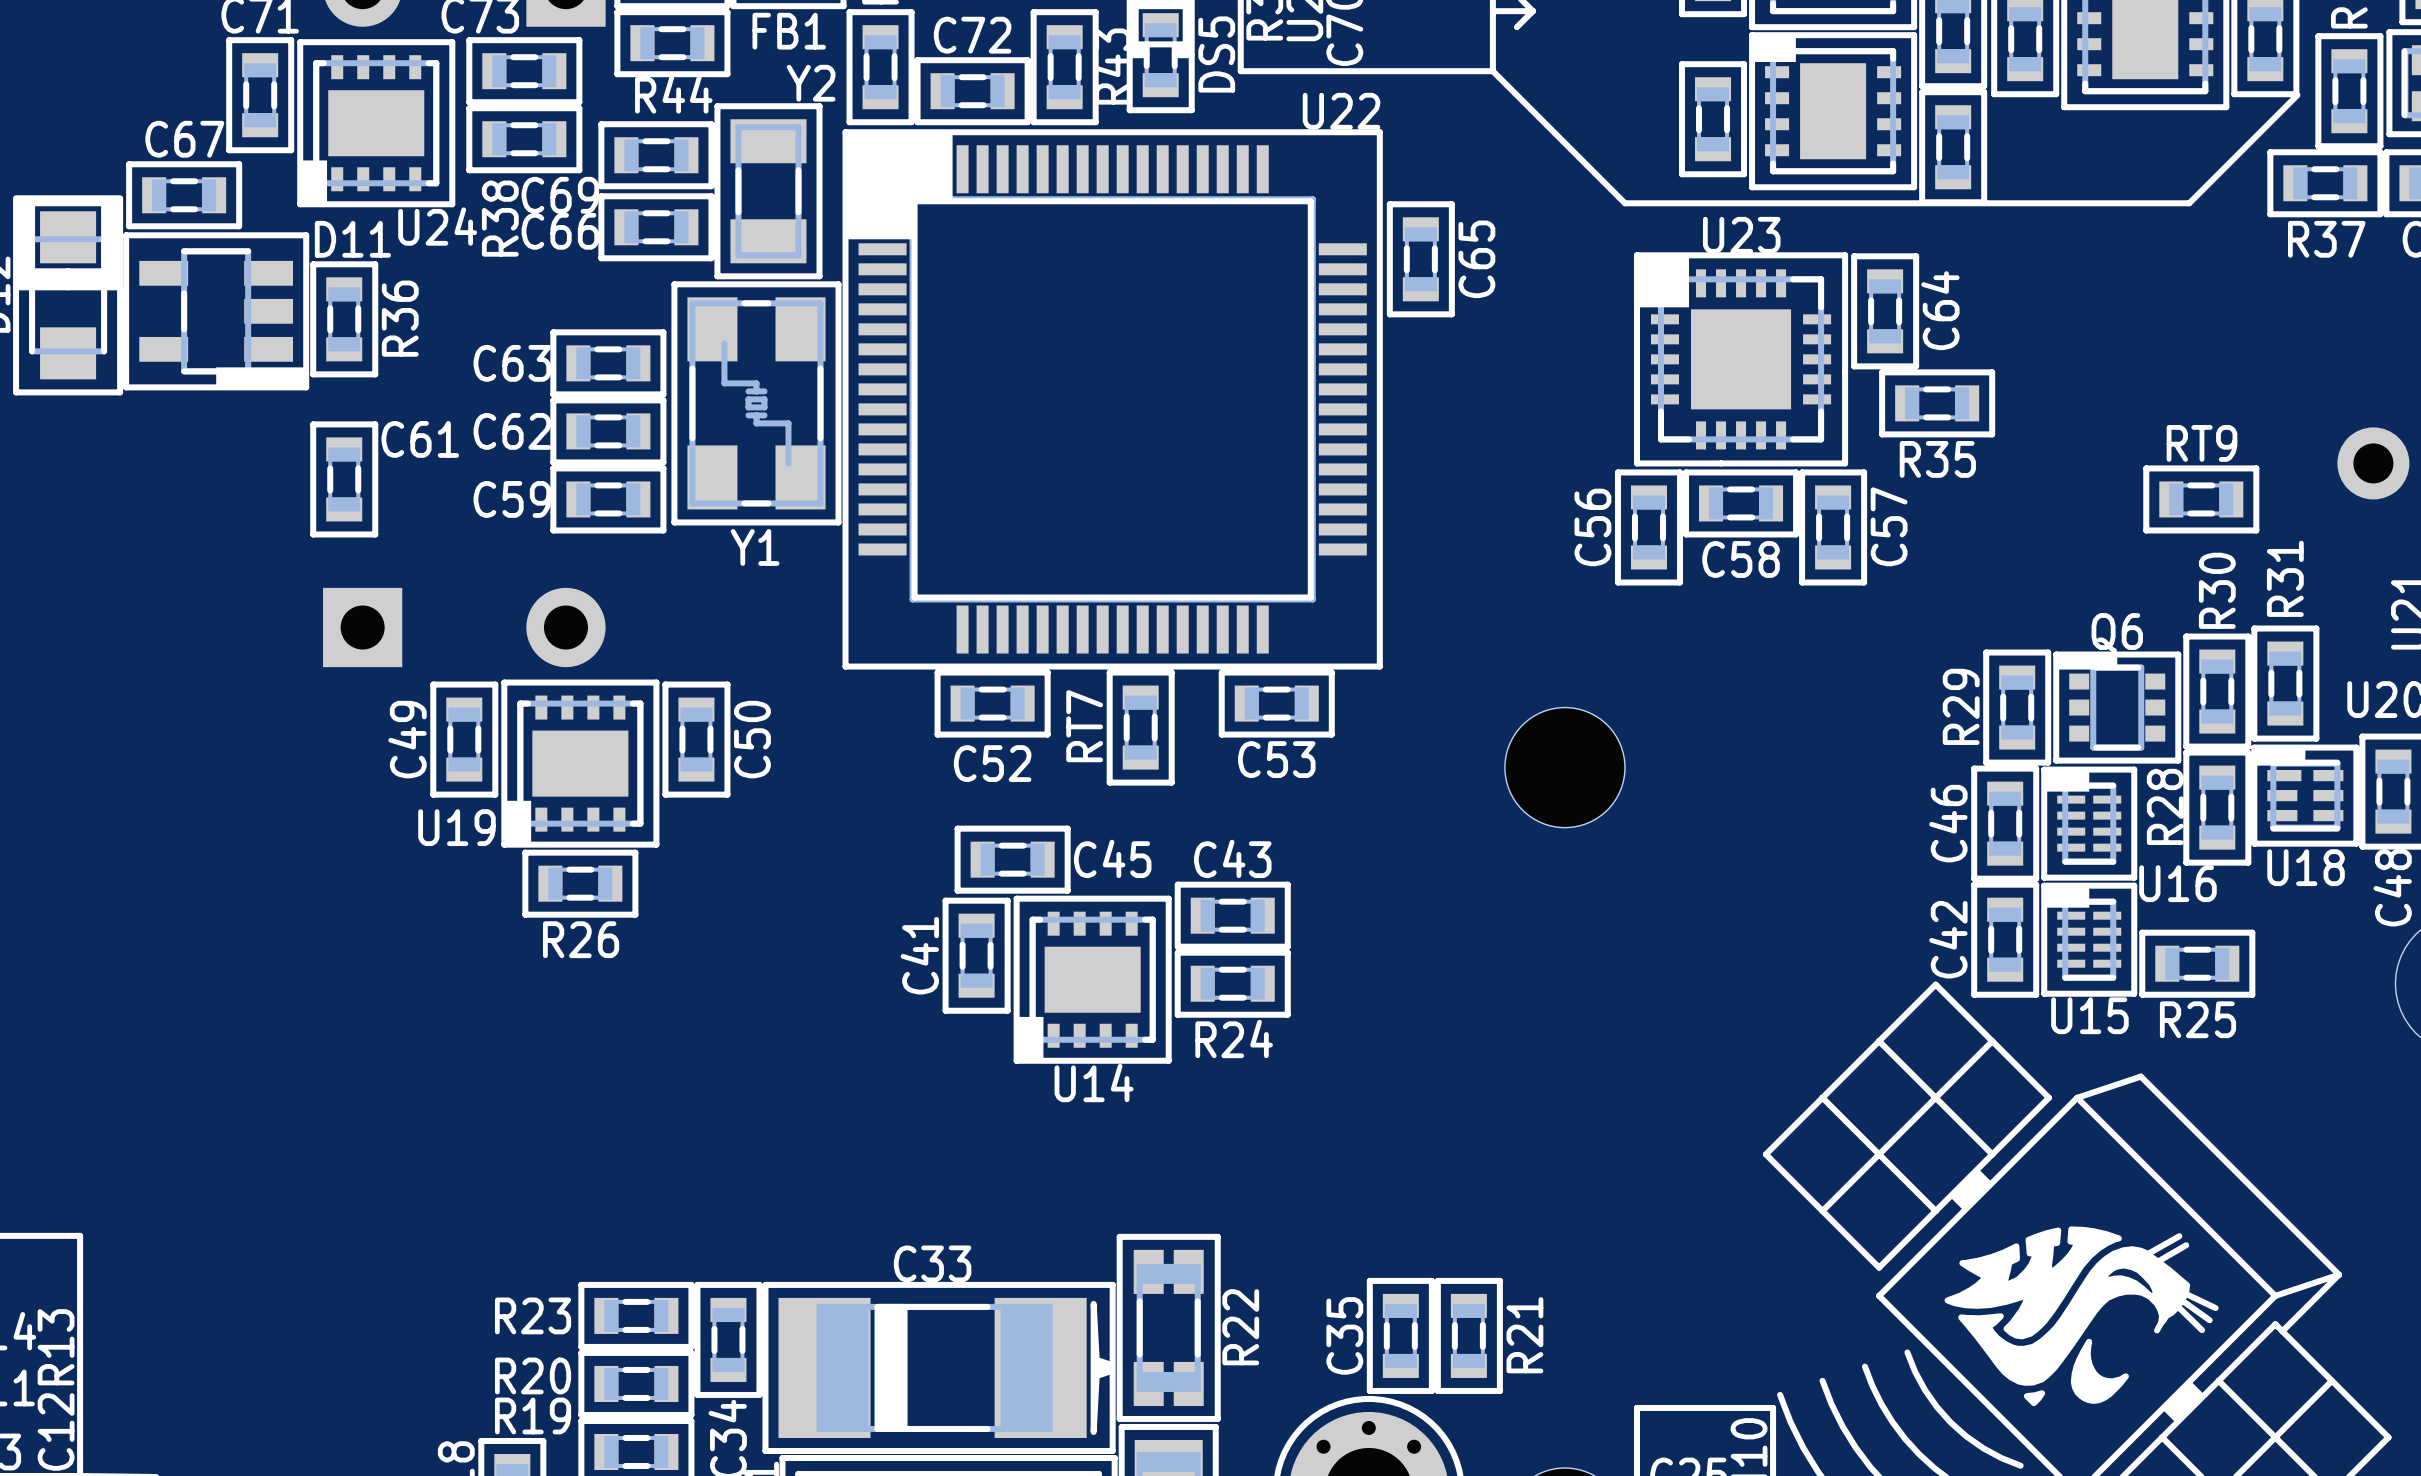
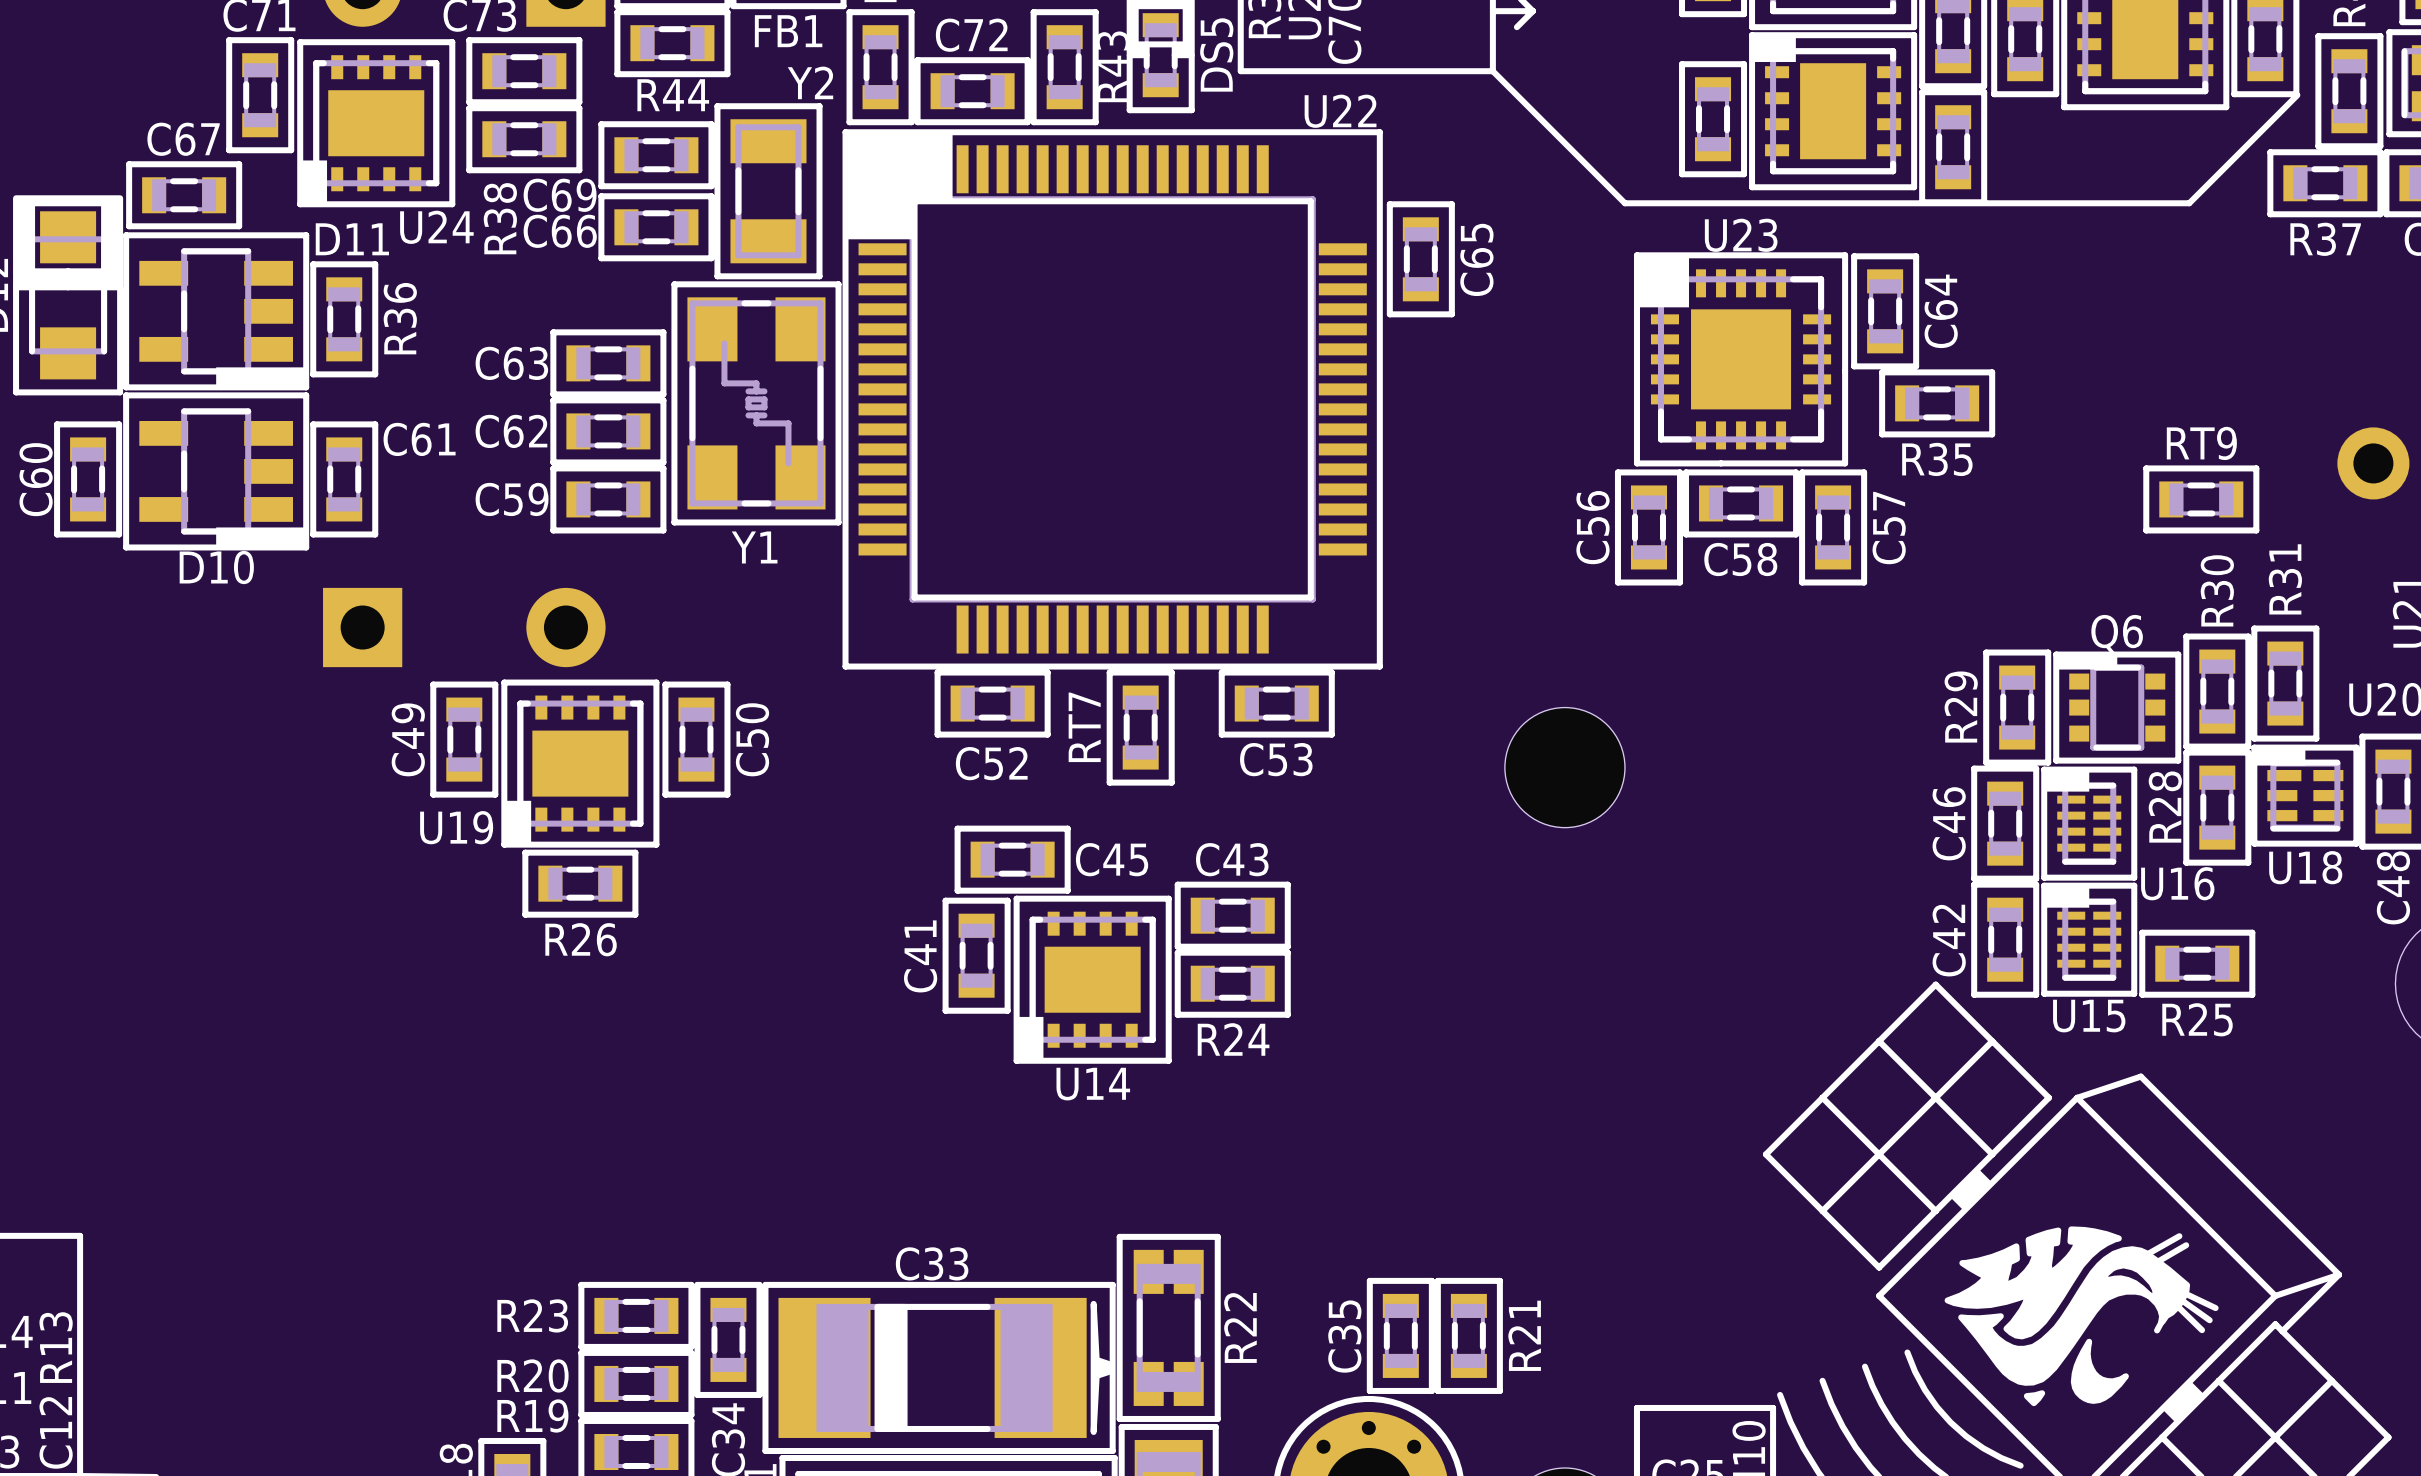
D10: none -> (216, 471)
C60: none -> (88, 479)

